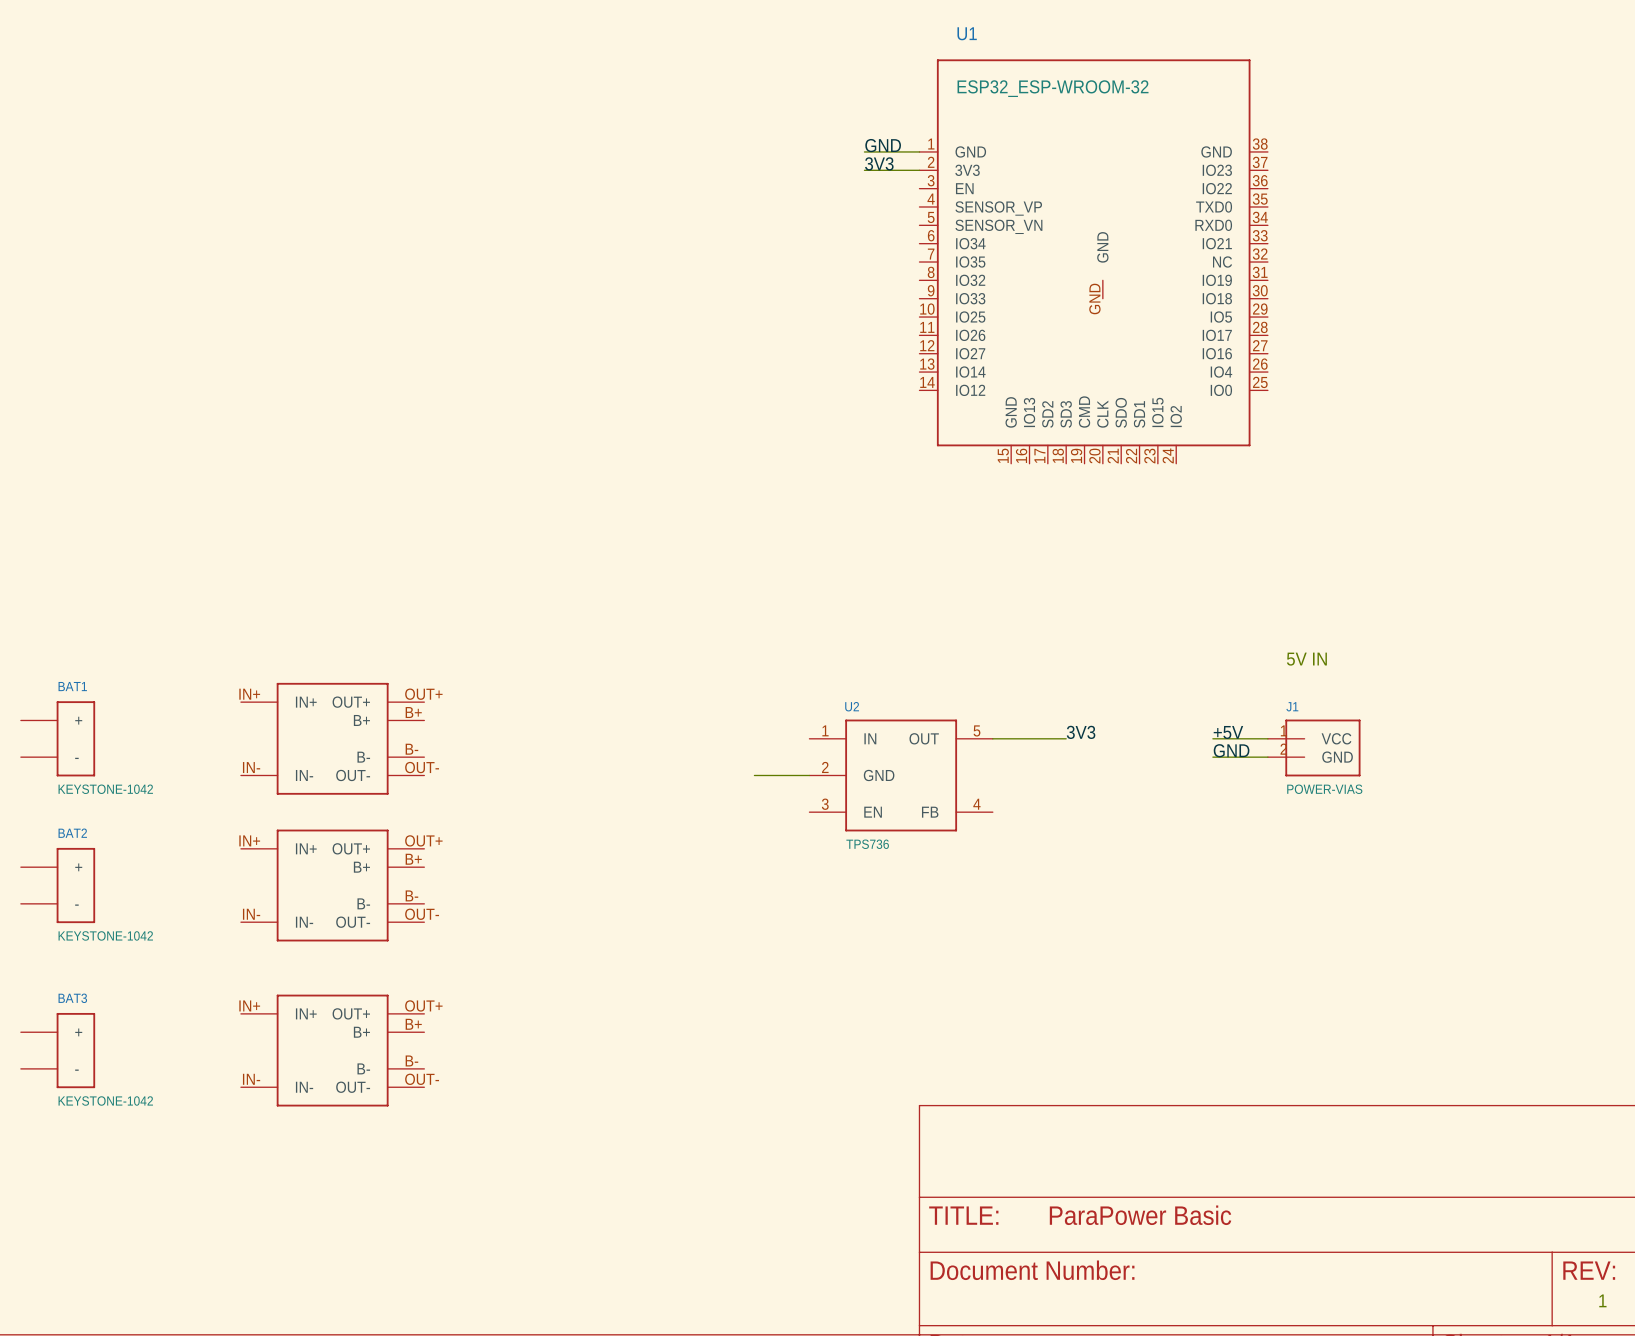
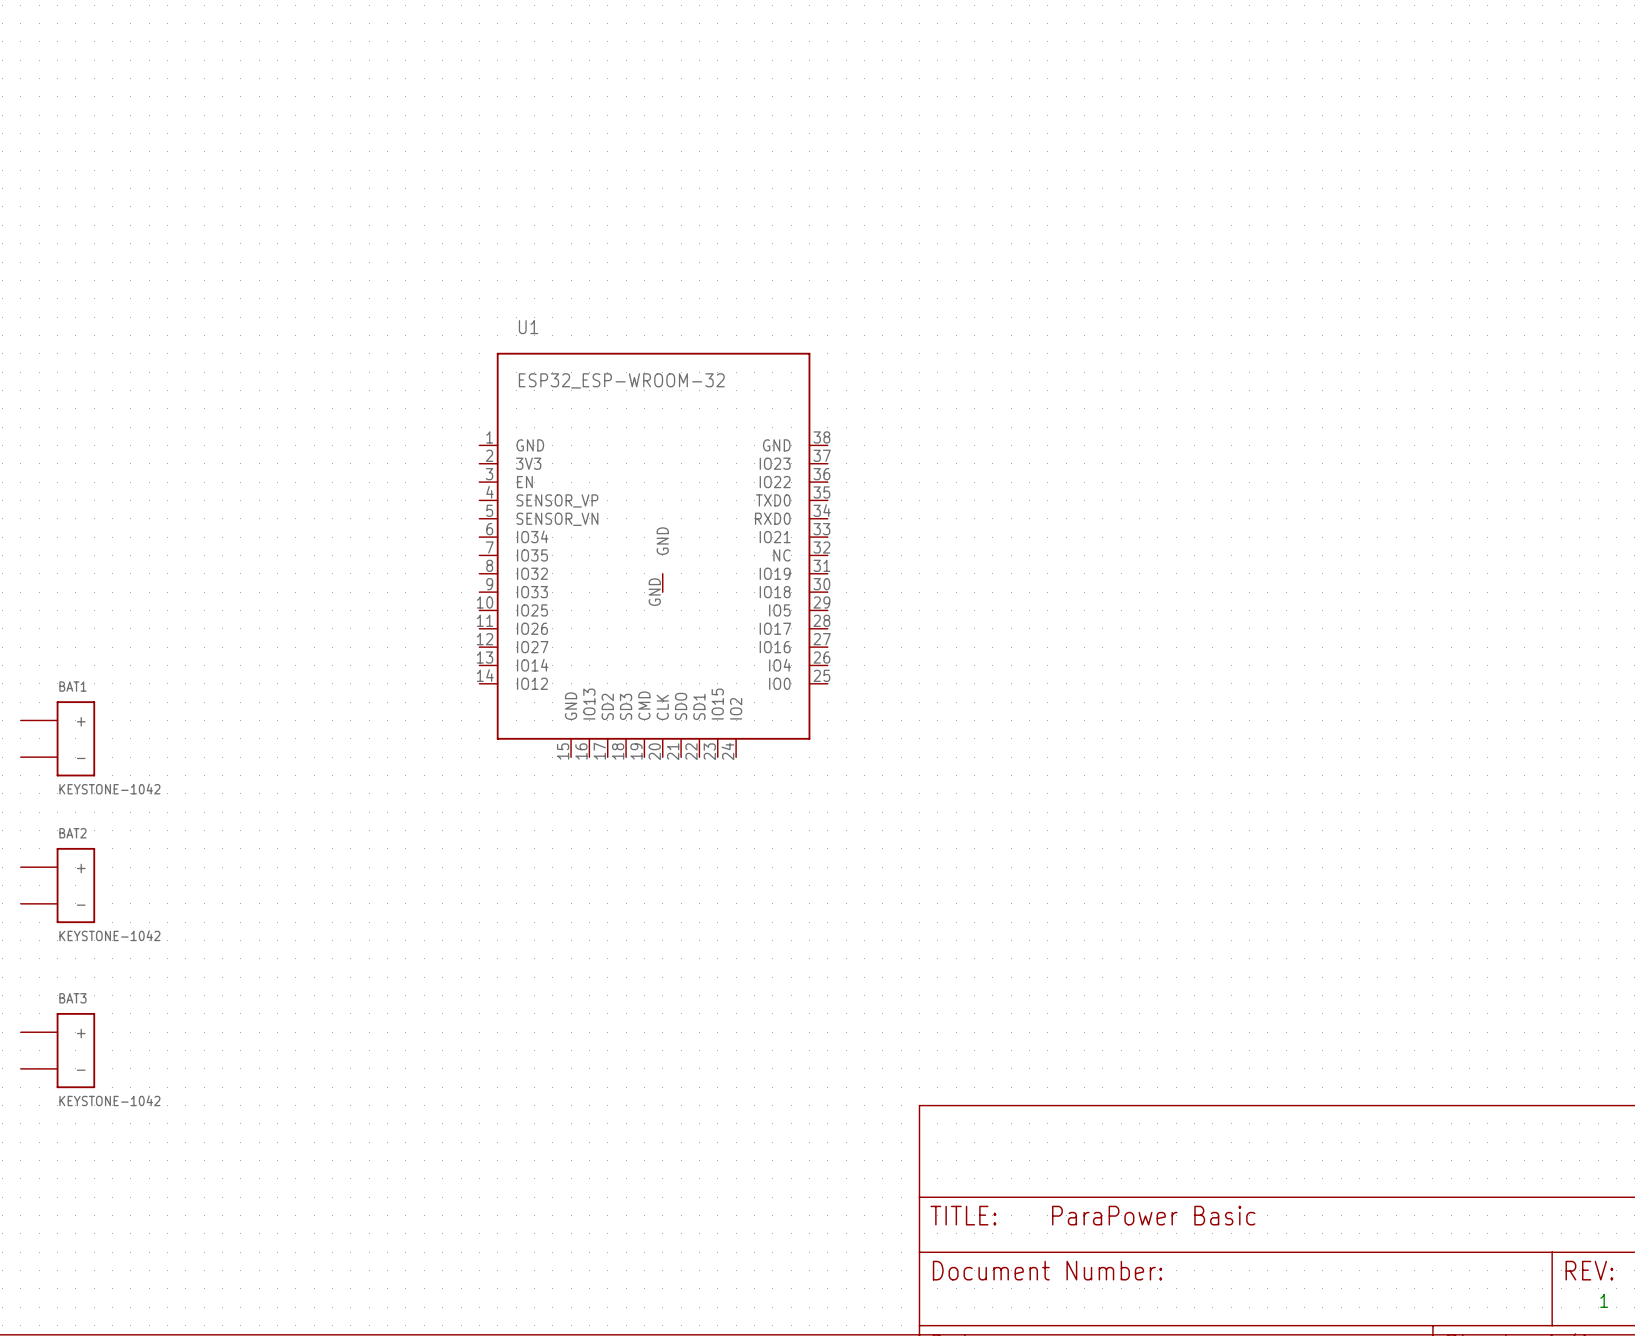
label: GND (883, 145) -> none
wire: (864, 151) (919, 151) -> none
label: 3V3 (879, 163) -> none
wire: (864, 170) (919, 170) -> none
U1 position: (1093, 261) -> (653, 554)
text: 5V IN (1306, 659) -> none
label: 3V3 (1081, 732) -> none
label: +5V (1228, 732) -> none
part: (332, 738) -> none
wire: (992, 738) (1066, 738) -> none
wire: (1212, 738) (1267, 738) -> none
J1: POWER-VIAS (1314, 747) -> none
label: GND (1231, 750) -> none
wire: (1212, 757) (1267, 757) -> none
wire: (754, 775) (809, 775) -> none
U2: TPS736 (901, 775) -> none
part: (332, 885) -> none
part: (332, 1050) -> none

